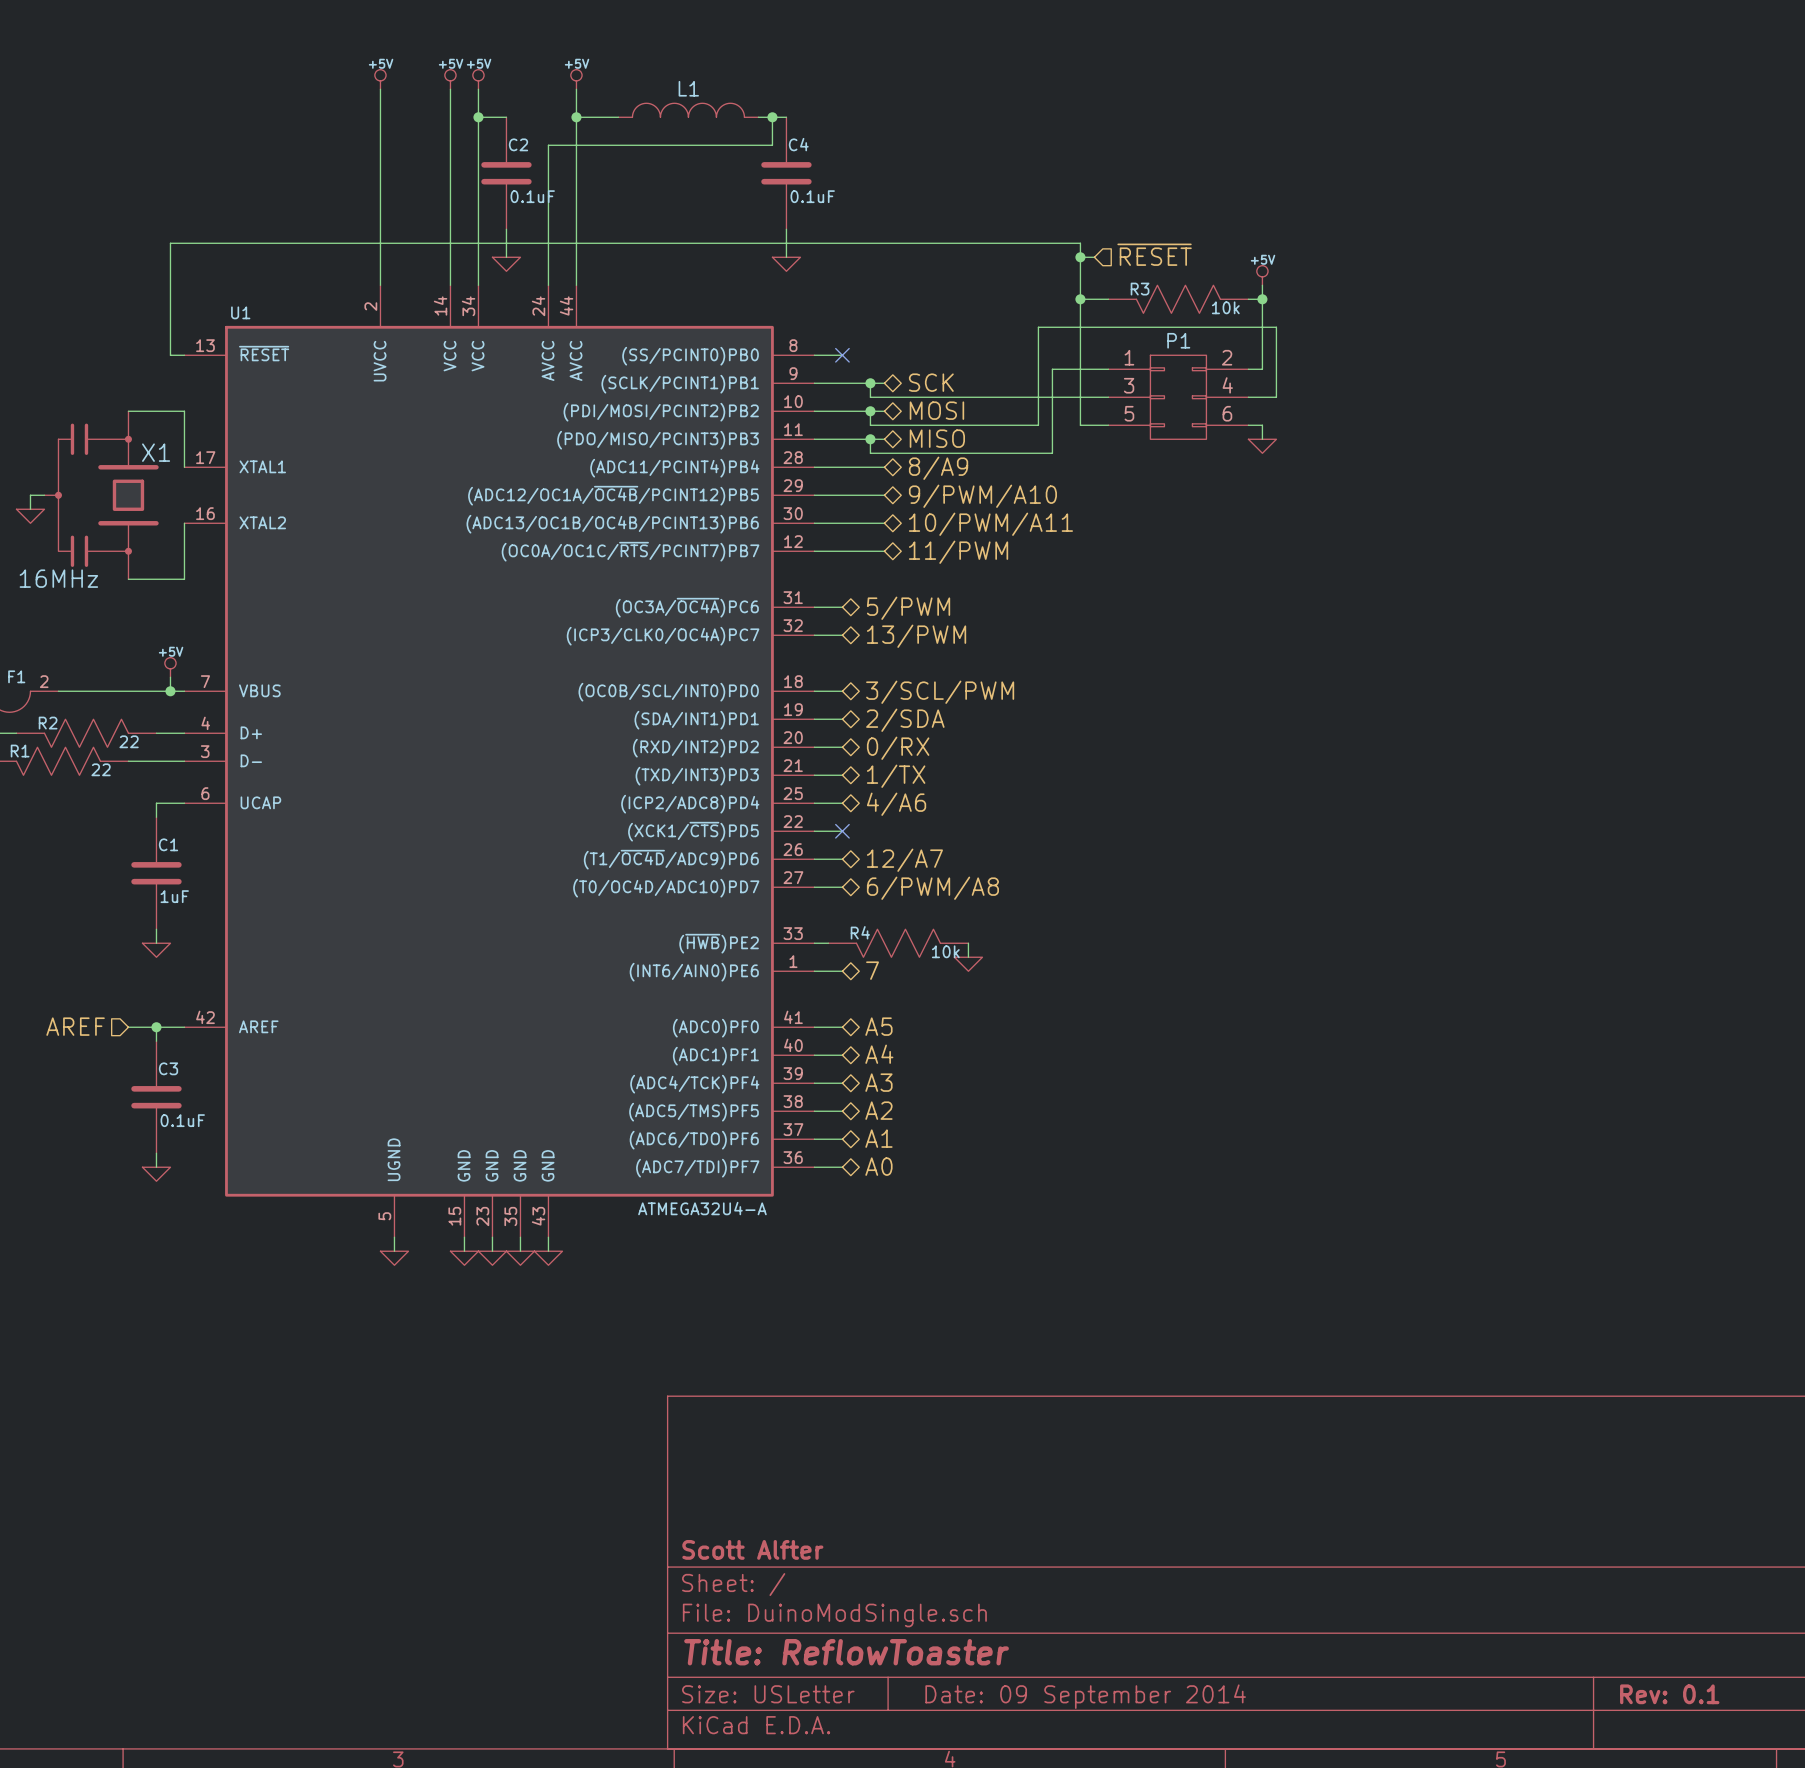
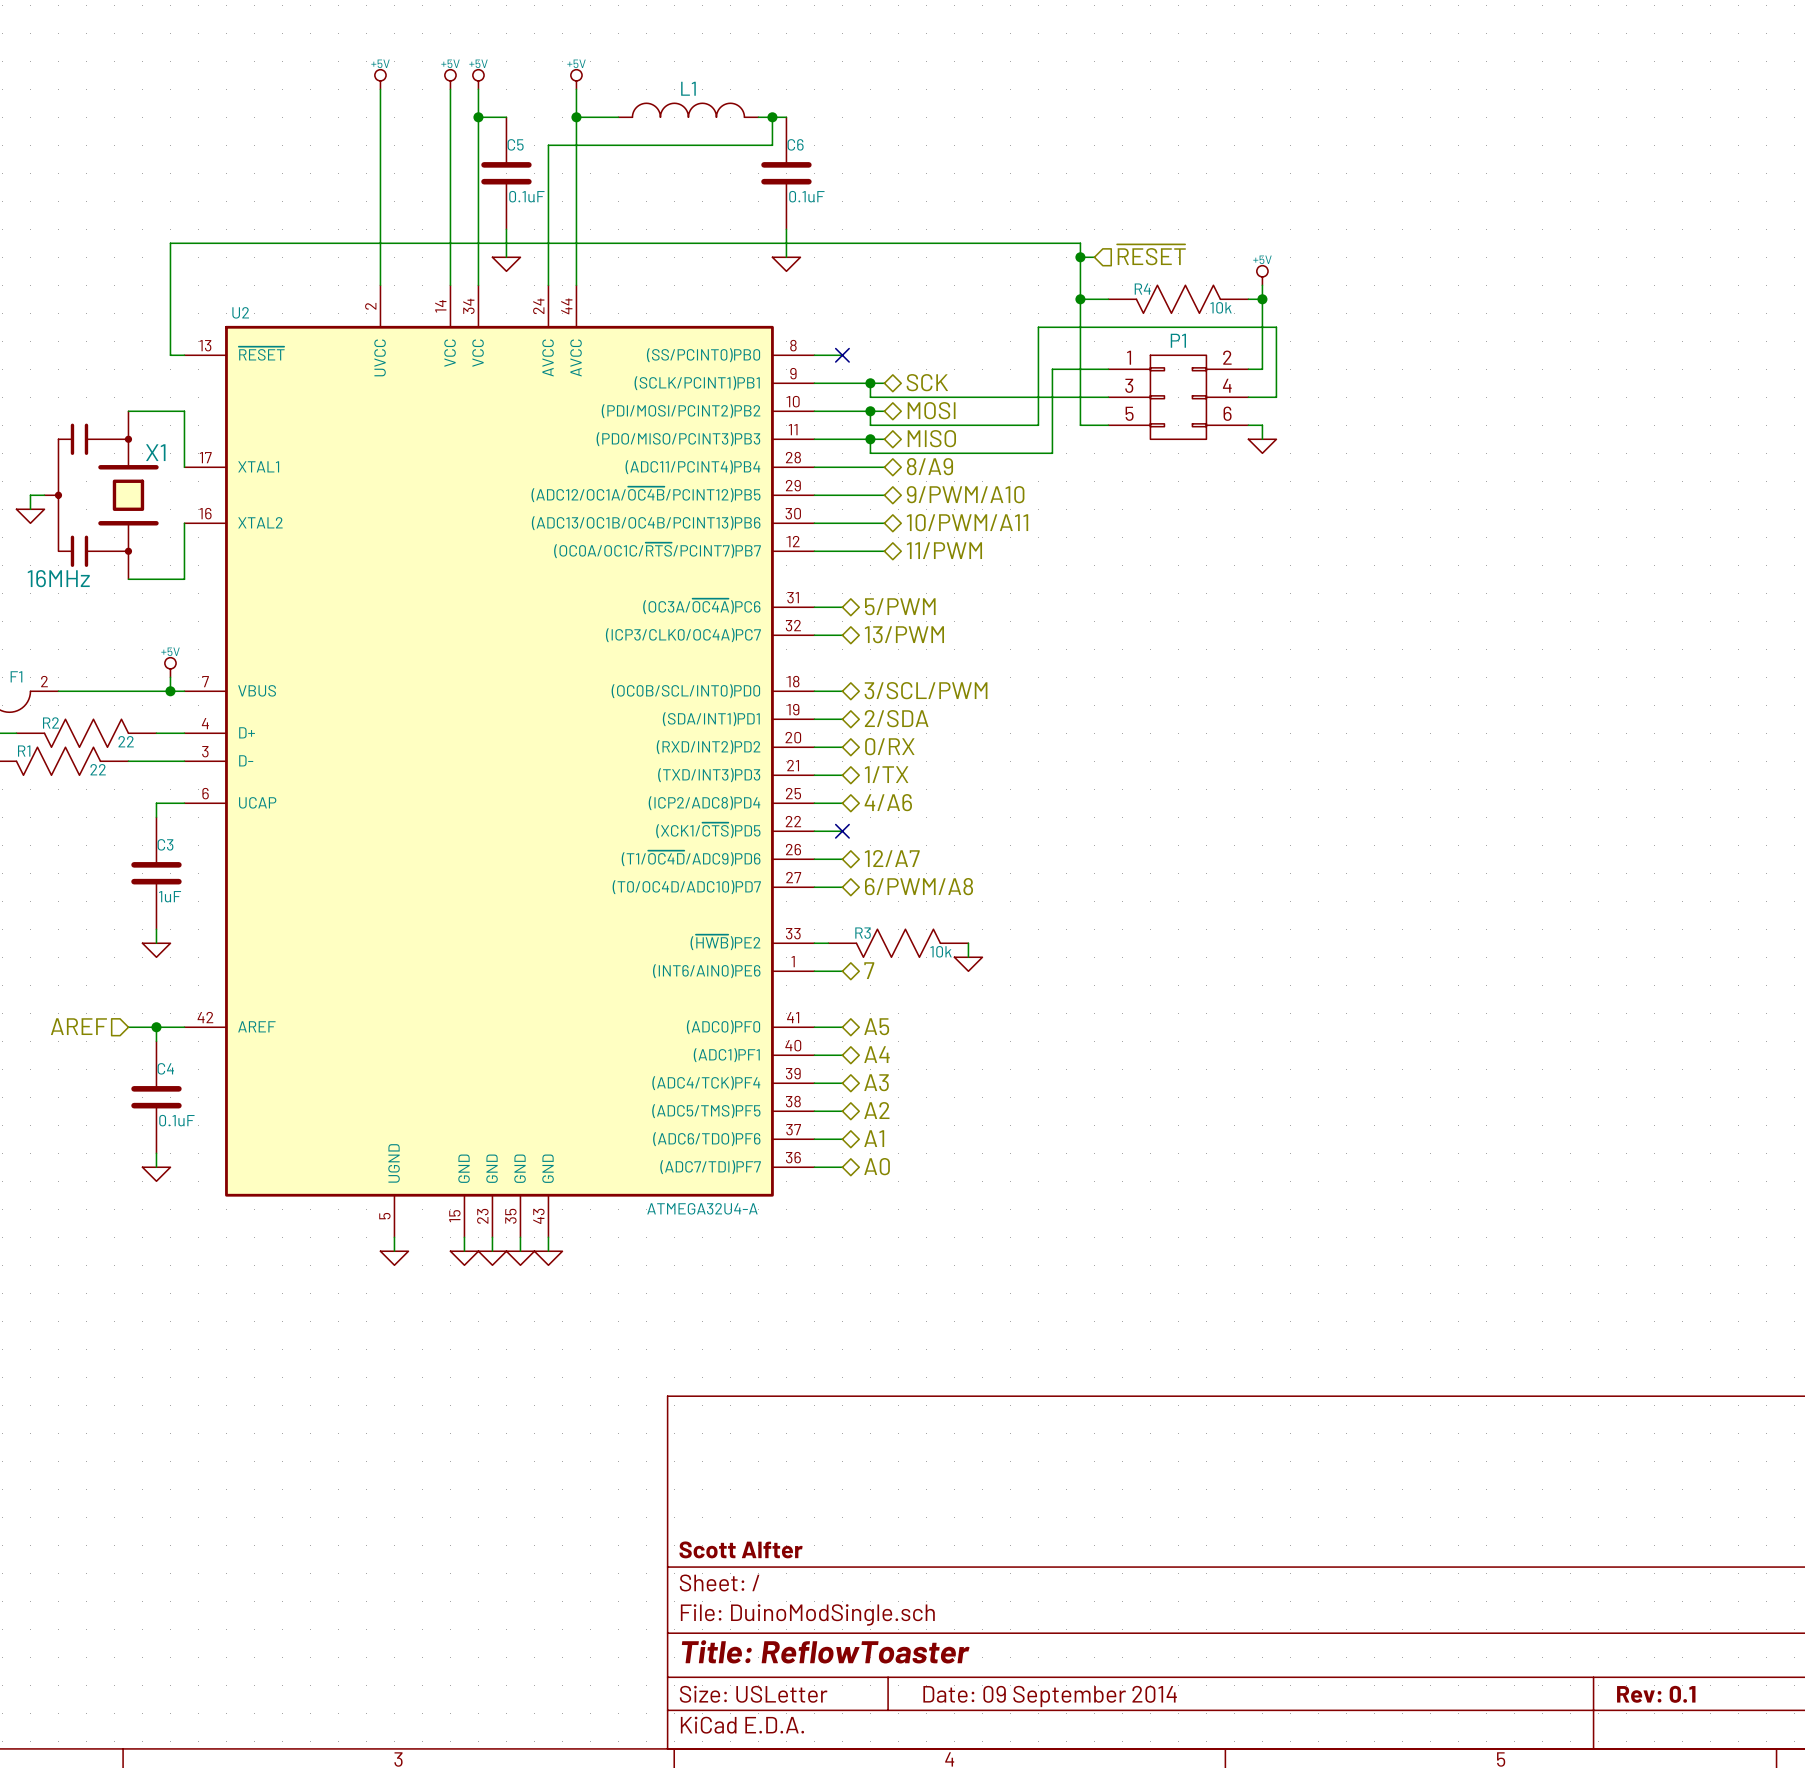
C2 name: C2 (518, 144) -> C5 (515, 144)
C4 name: C4 (798, 144) -> C6 (795, 144)
R3 name: R3 (1140, 289) -> R4 (1142, 289)
U1 name: U1 (240, 312) -> U2 (240, 312)
C1 name: C1 (168, 844) -> C3 (165, 844)
R4 name: R4 (860, 932) -> R3 (863, 933)
C3 name: C3 (168, 1068) -> C4 (165, 1068)

